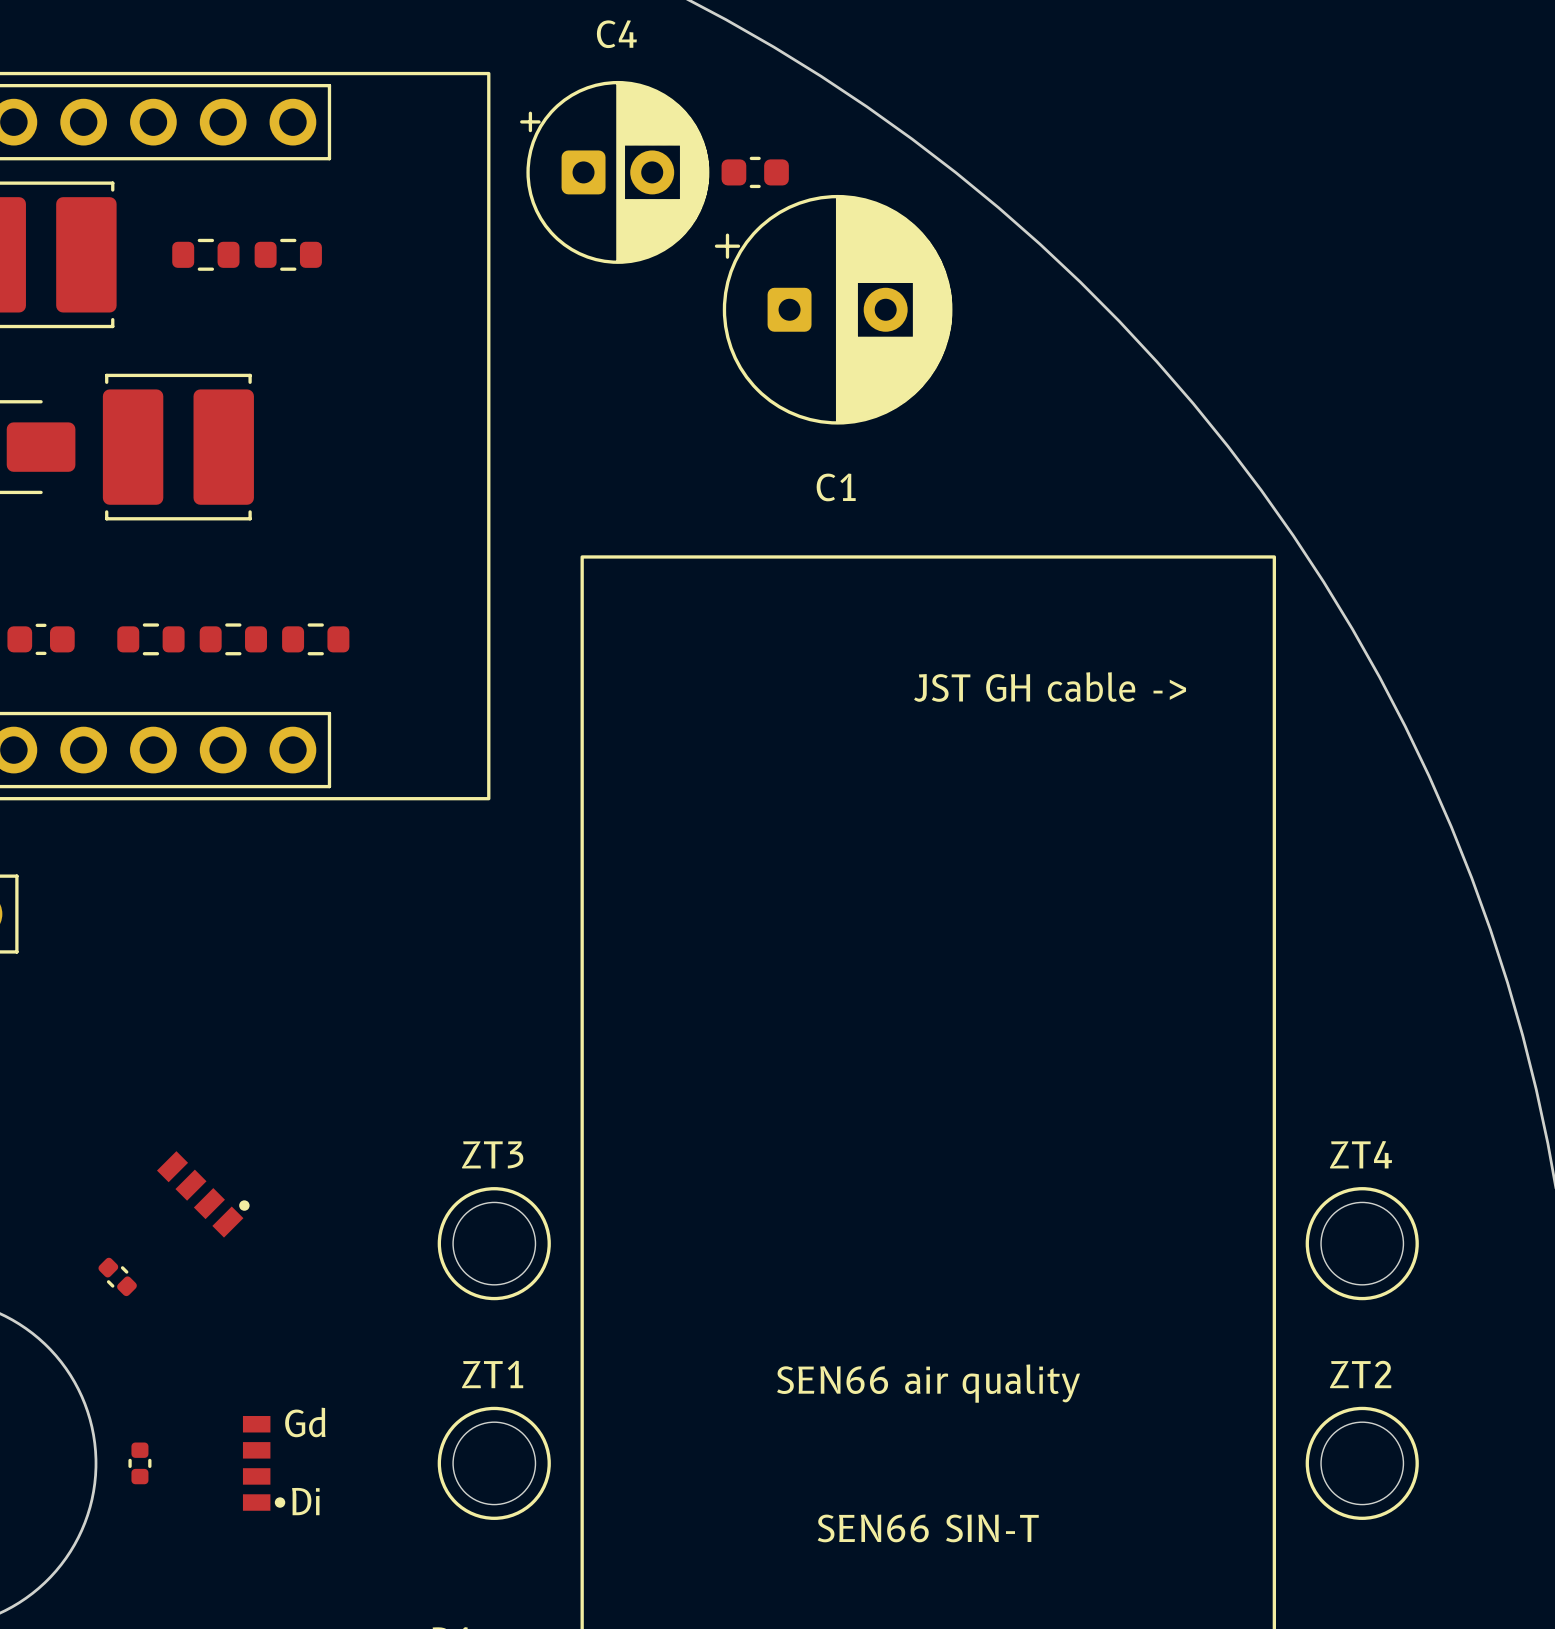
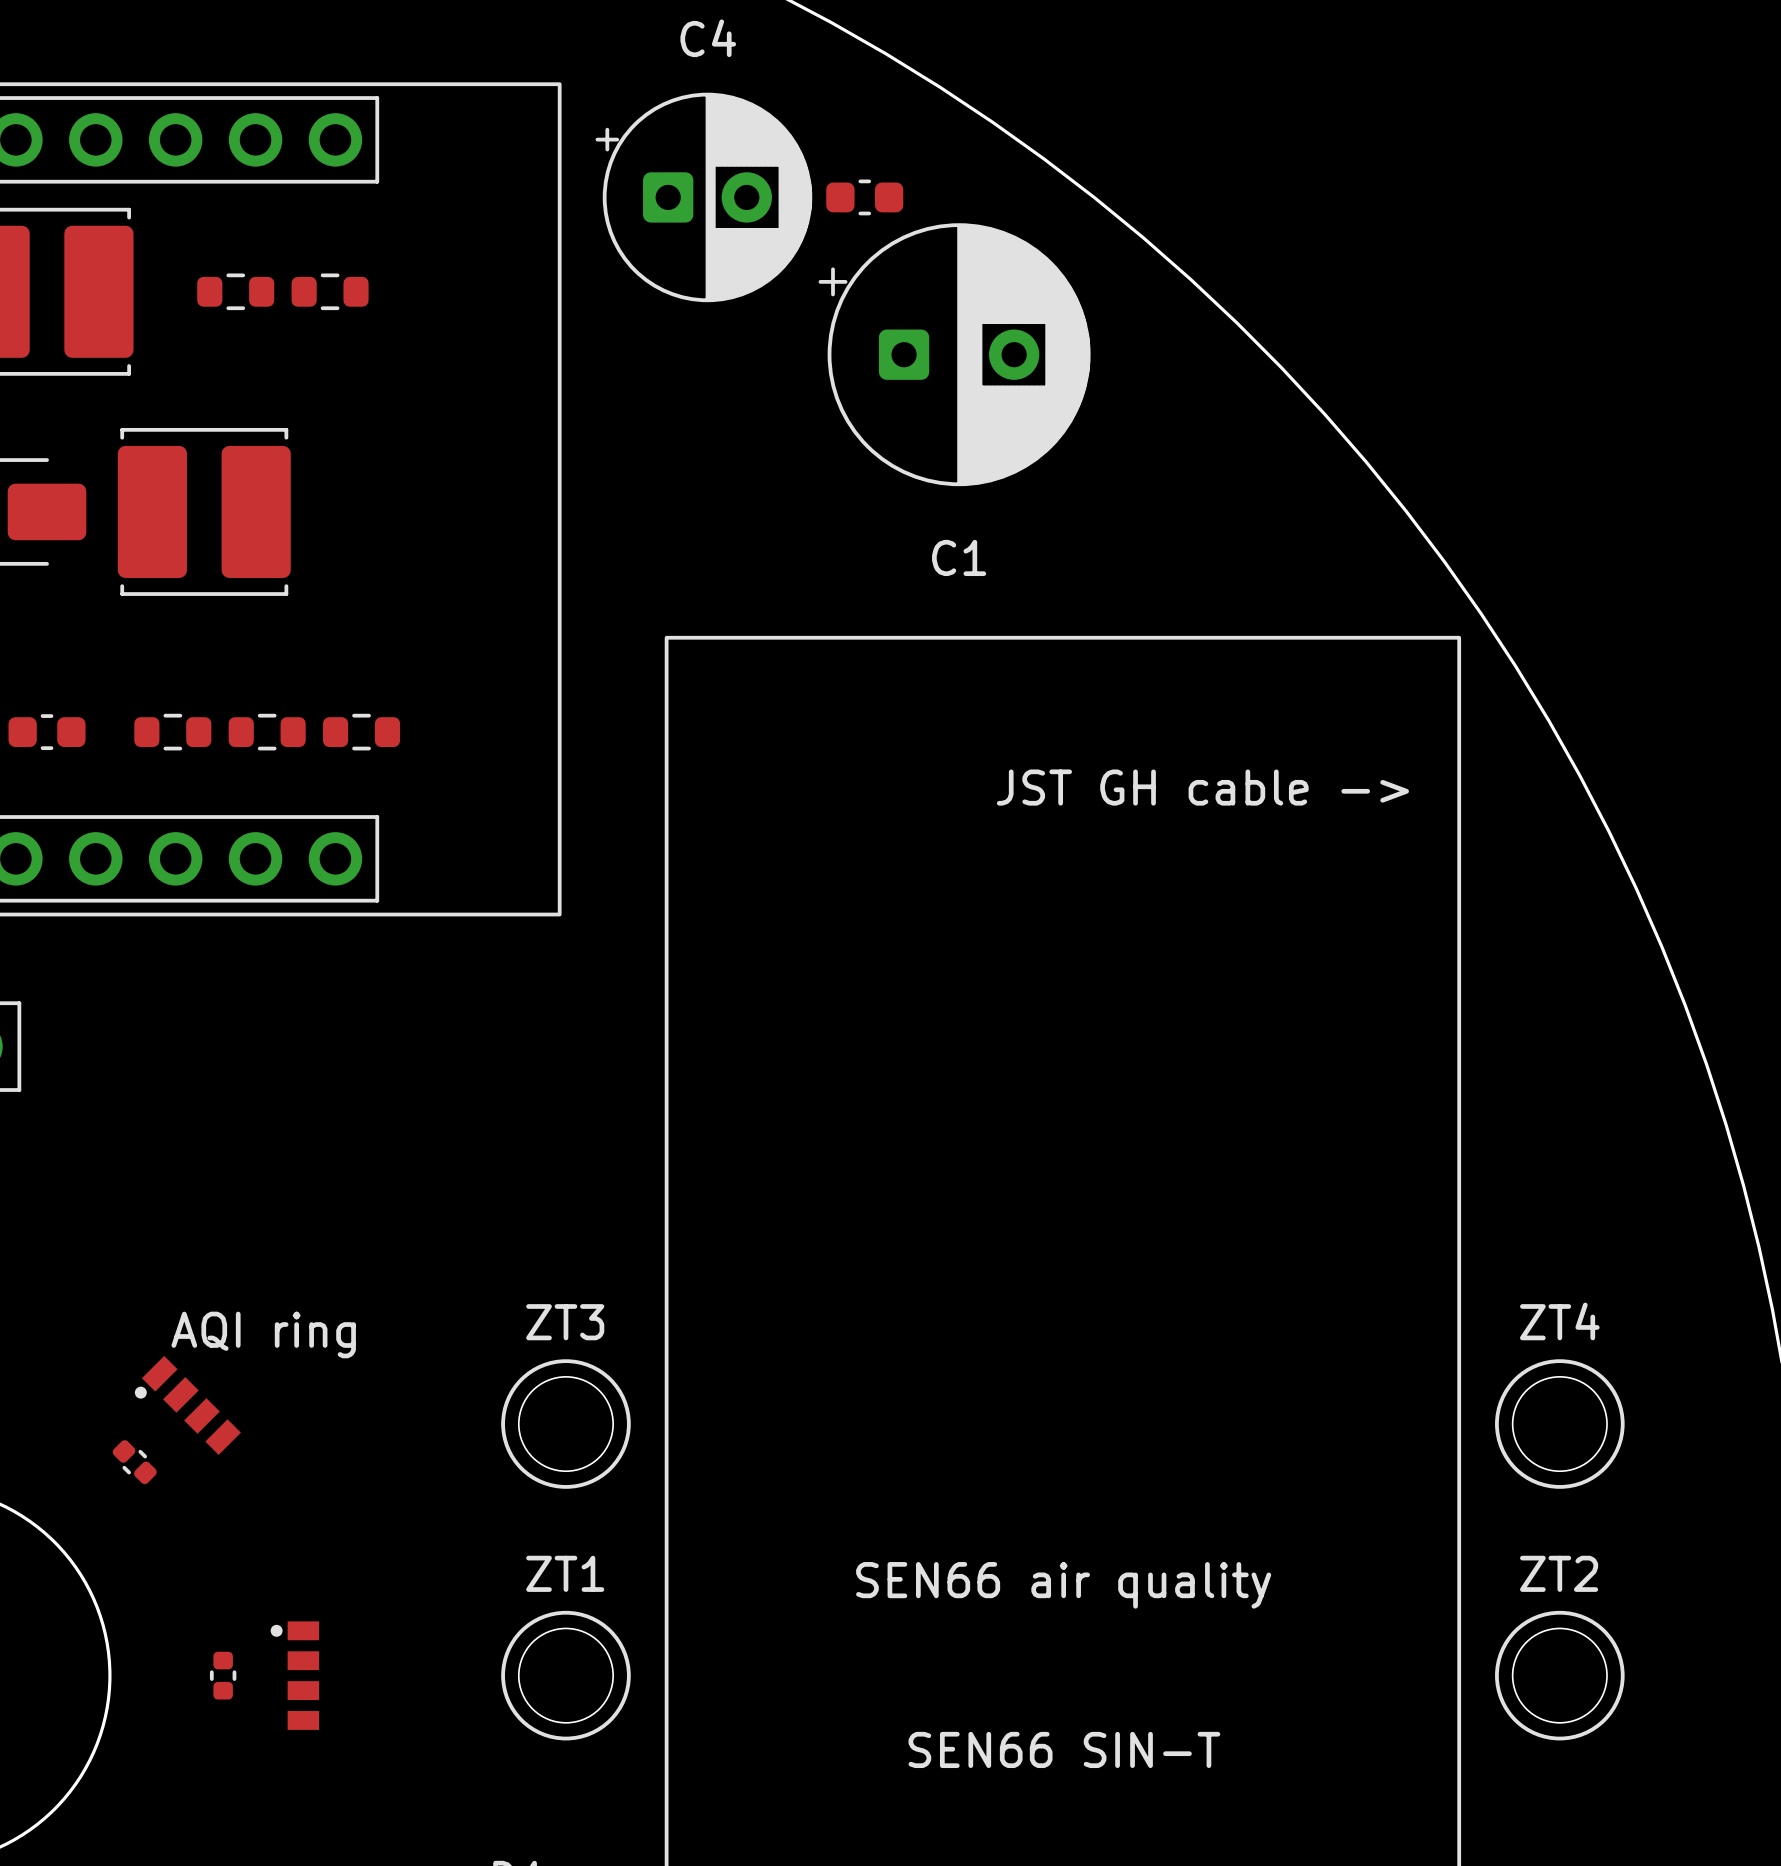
text: none -> AQI ring (263, 1334)
part rotation: 0° (203, 1194) -> 180° (187, 1405)
part footprint: [242, 1416, 286, 1511] -> [270, 1621, 320, 1730]
part position: (139, 1463) -> (223, 1675)

